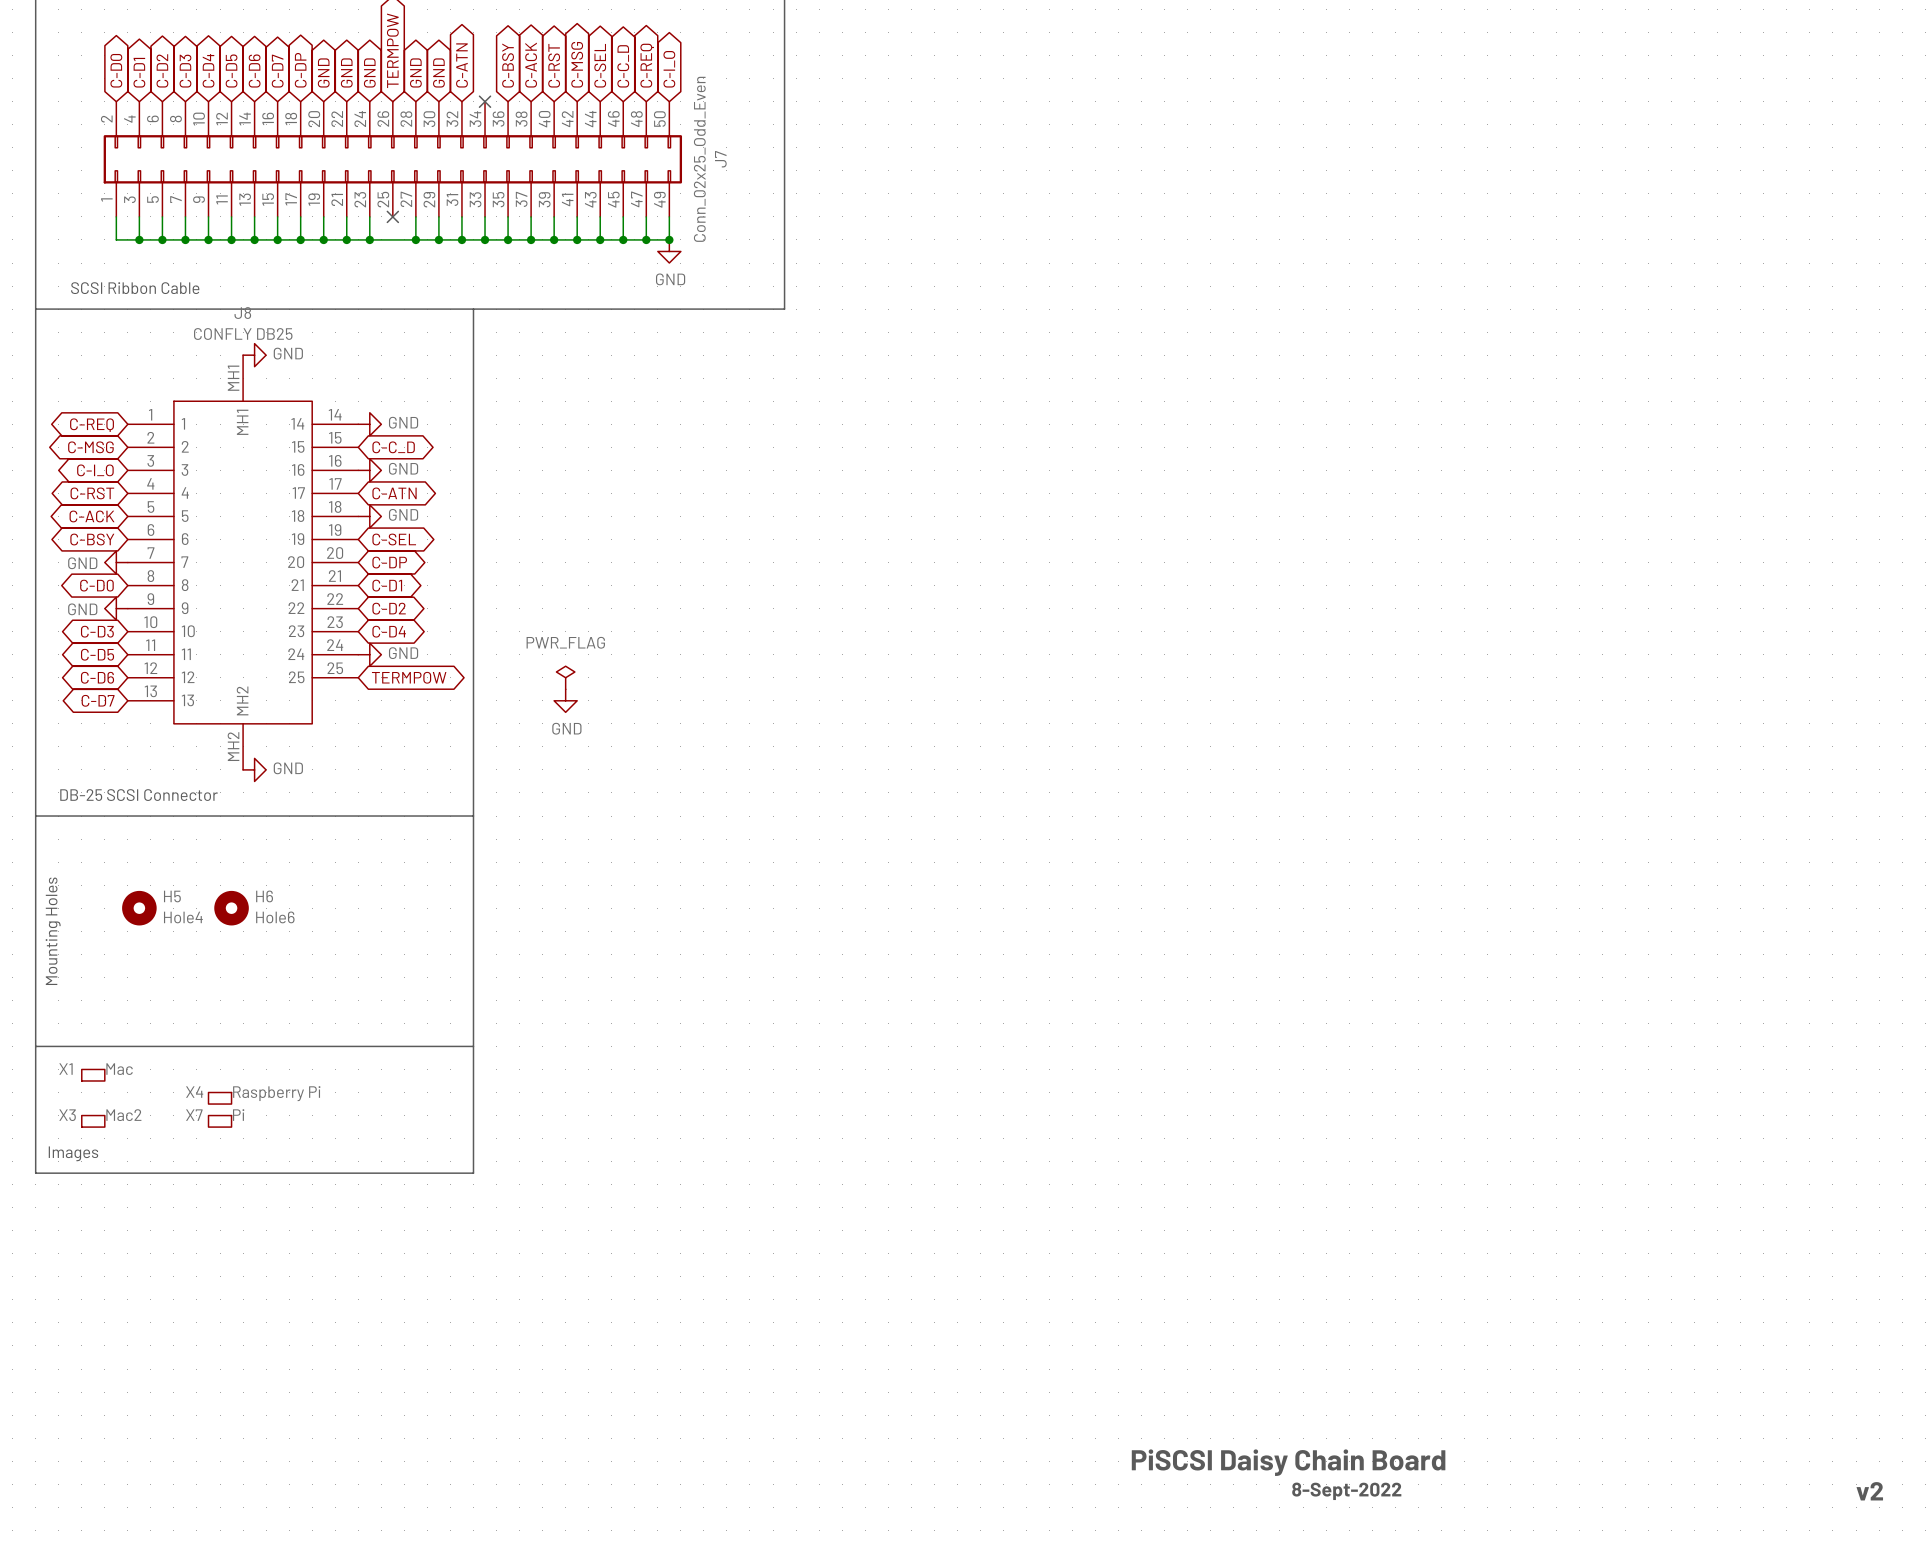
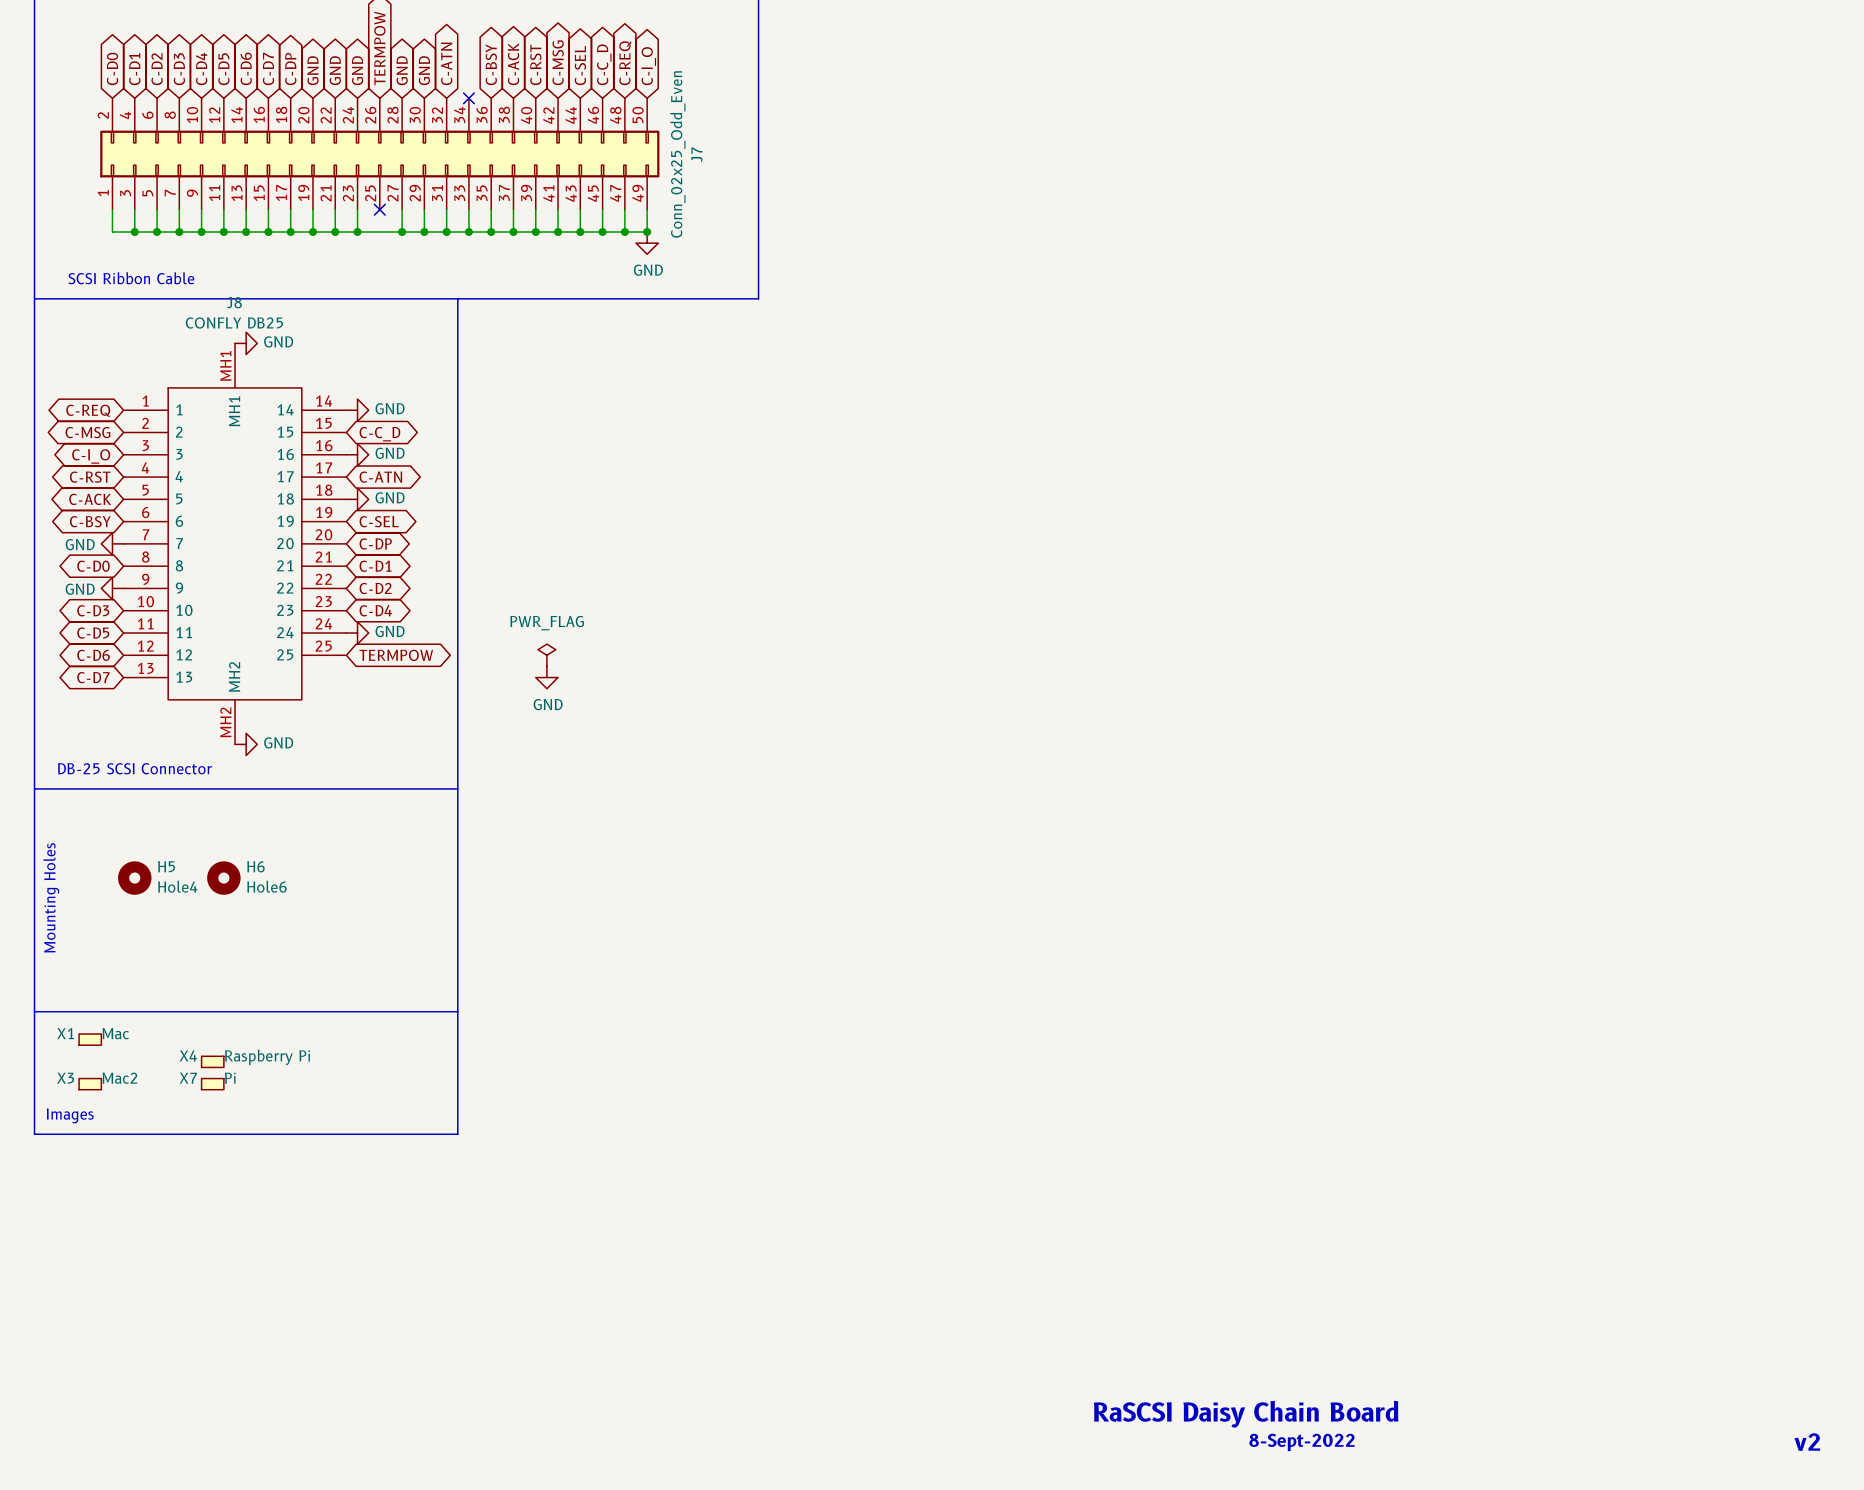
text: PiSCSI Daisy Chain Board (1288, 1462) -> RaSCSI Daisy Chain Board (1246, 1414)

